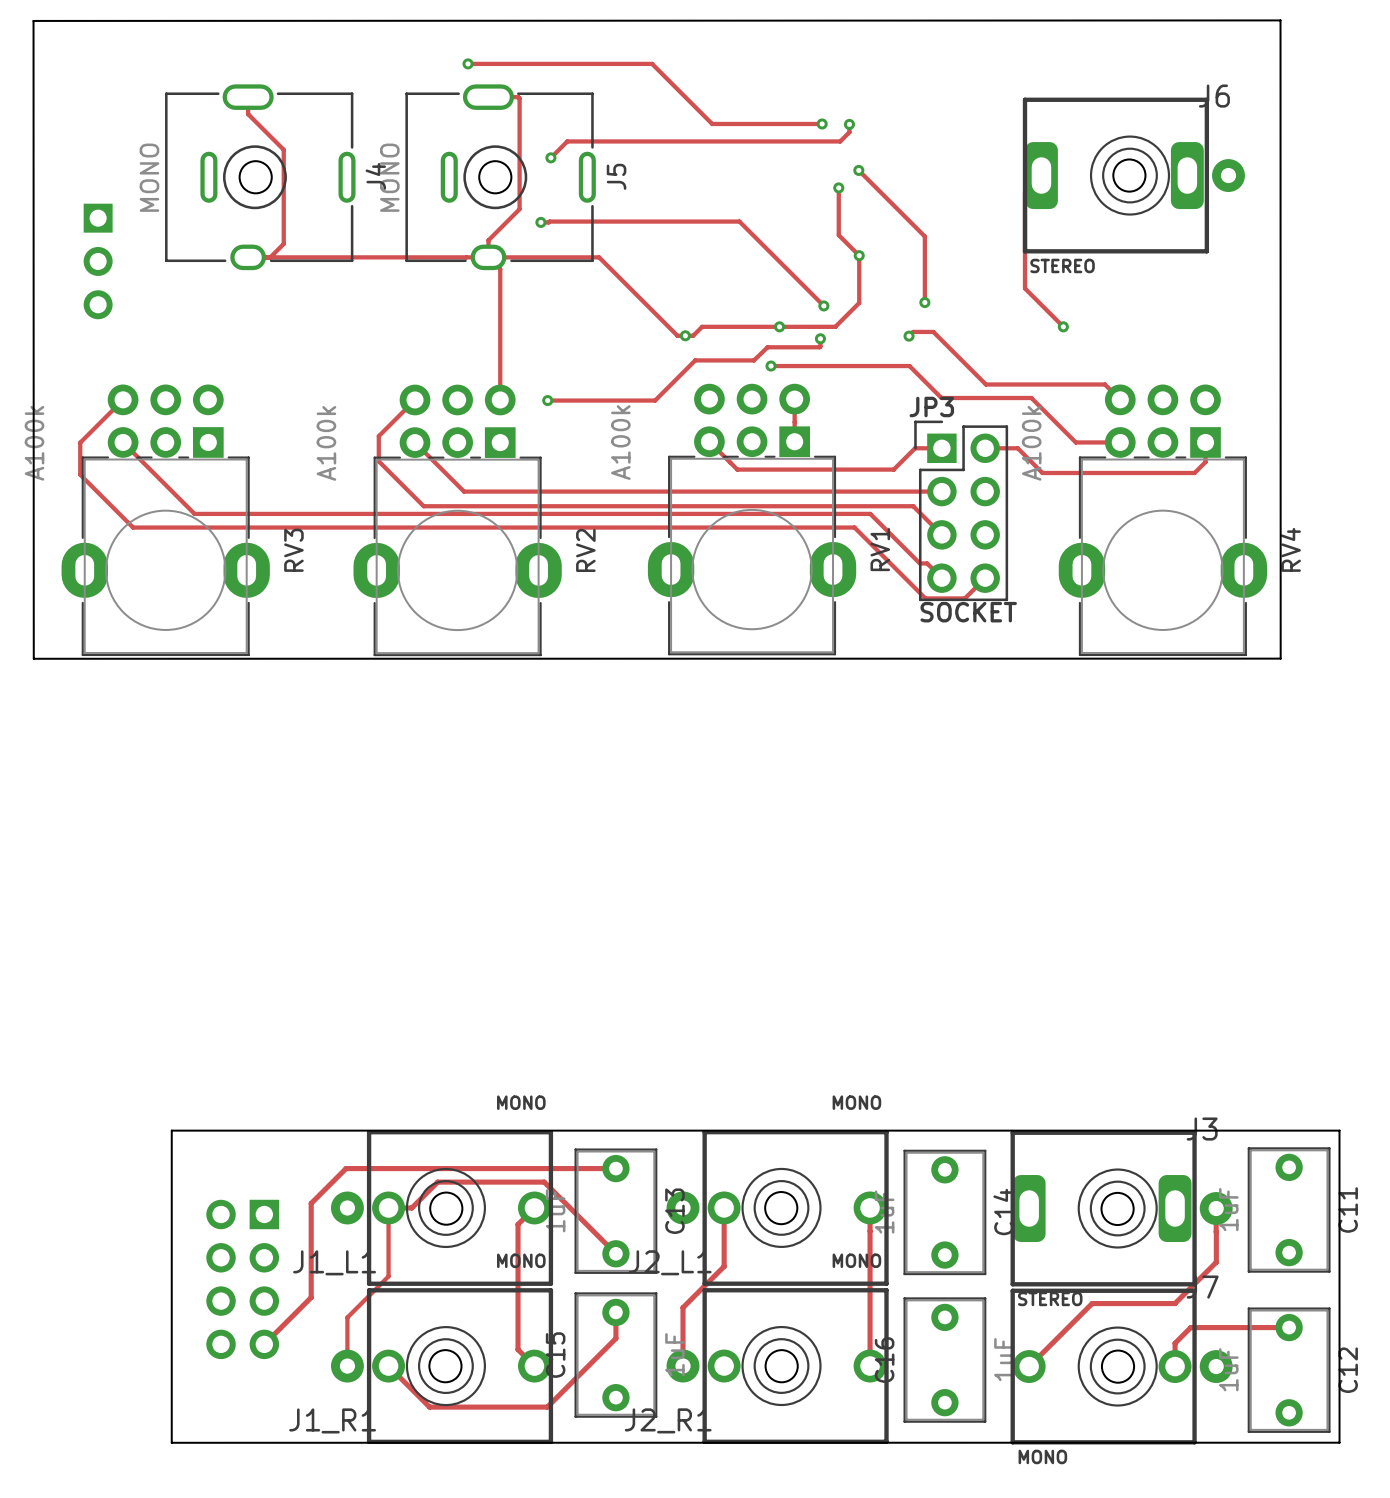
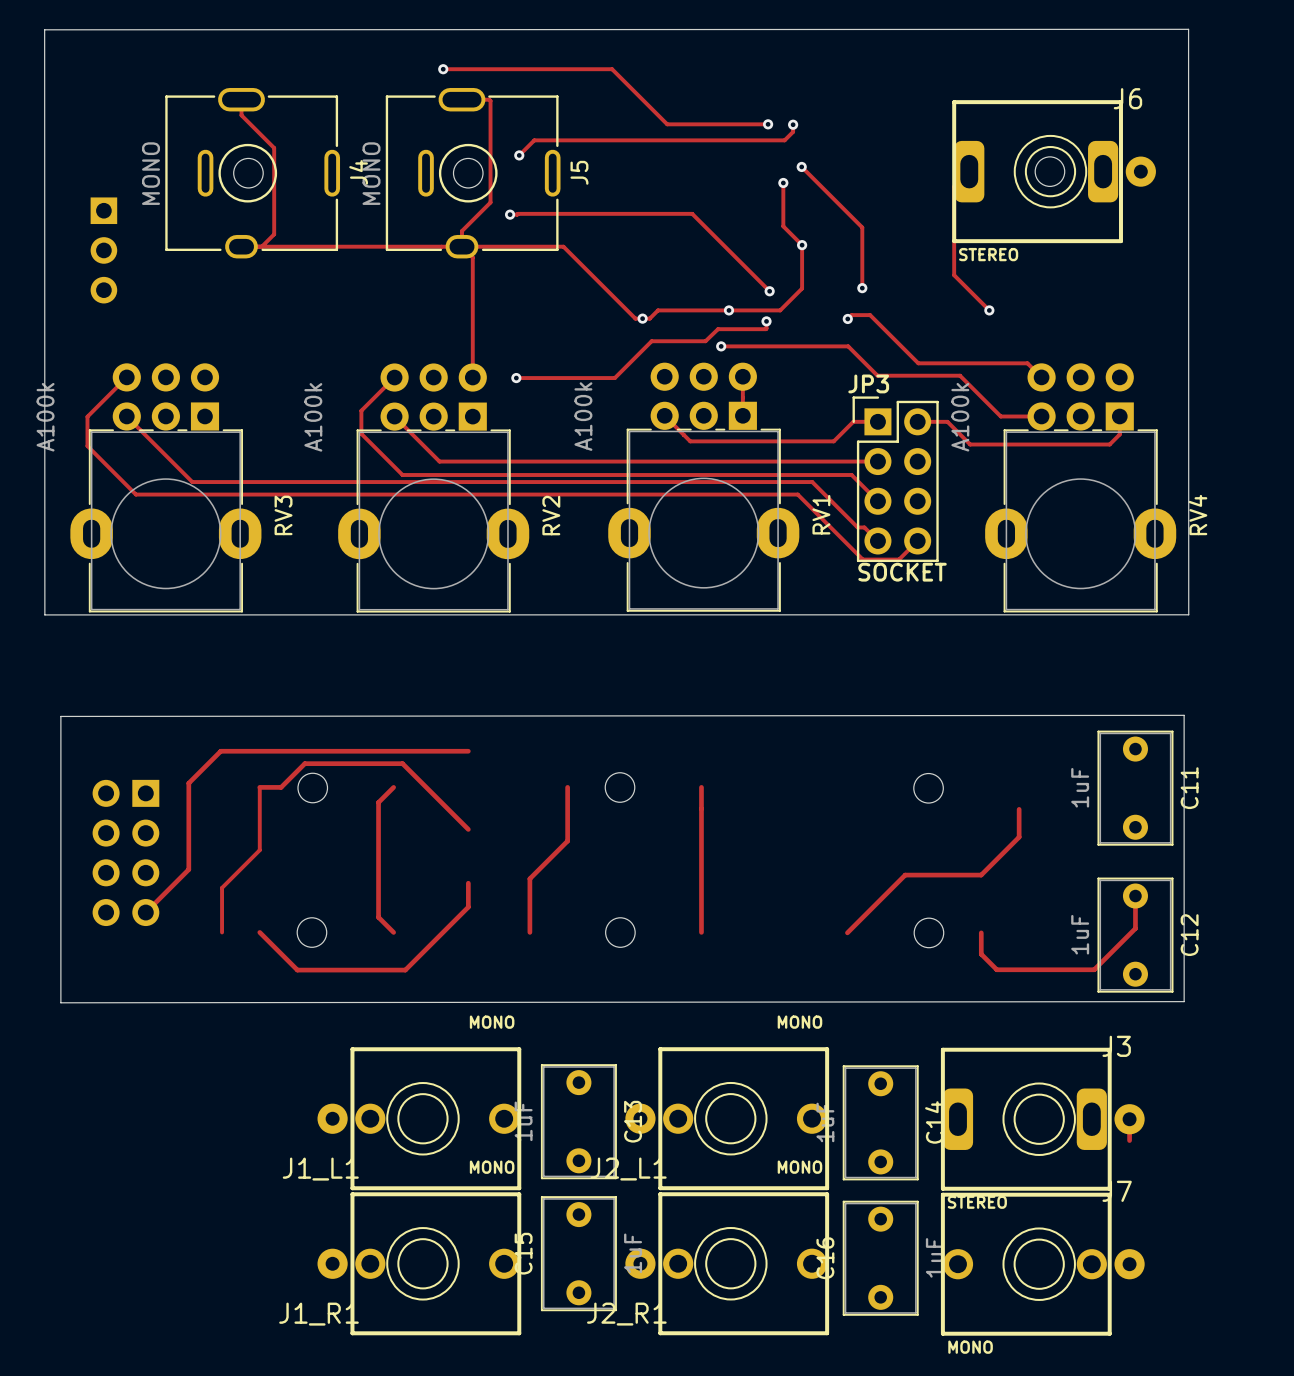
board edge: none -> (1184, 715) (60, 716) (60, 1002) (1184, 1001) (1184, 715)
round board edge: none -> [297, 772, 328, 804]
round board edge: none -> [604, 772, 636, 803]
round board edge: none -> [913, 773, 944, 804]
track: none -> (1135, 896) (1135, 928) (1094, 969) (996, 969) (981, 954) (981, 932)
round board edge: none -> [296, 917, 328, 948]
round board edge: none -> [605, 917, 636, 948]
round board edge: none -> [913, 917, 945, 949]
board edge: (171, 1130) (1339, 1130) (1339, 1442) (171, 1442) (171, 1130) -> none
track: (615, 1168) (346, 1168) (311, 1203) (311, 1297) (264, 1344) -> (468, 751) (220, 751) (188, 783) (188, 869) (145, 912)
round board edge: [764, 1191, 798, 1225] -> none
round board edge: [429, 1192, 463, 1226] -> none
round board edge: [1101, 1192, 1135, 1226] -> none
track: (534, 1207) (518, 1224) (518, 1349) (534, 1366) -> (393, 787) (378, 802) (378, 917) (393, 932)
track: (724, 1207) (724, 1266) (683, 1307) (683, 1366) -> (567, 787) (567, 841) (529, 878) (529, 932)
track: (870, 1207) (870, 1366) -> (701, 787) (701, 932)
C11 position: (1289, 1209) -> (1135, 788)
track: (1216, 1231) (1216, 1262) (1175, 1303) (1092, 1303) (1029, 1366) -> (1019, 809) (1019, 837) (981, 875) (905, 875) (847, 932)
track: (615, 1253) (544, 1182) (437, 1182) (411, 1207) (388, 1207) (388, 1276) (347, 1317) (347, 1366) -> (468, 829) (402, 763) (304, 763) (281, 787) (259, 787) (259, 850) (222, 887) (222, 932)
part position: (242, 1279) -> (125, 852)
track: (615, 1312) (615, 1338) (547, 1407) (429, 1407) (388, 1366) -> (468, 883) (468, 907) (405, 970) (297, 970) (259, 932)
track: (1289, 1327) (1190, 1327) (1175, 1343) (1175, 1366) -> none
round board edge: [428, 1349, 462, 1383] -> none
round board edge: [765, 1349, 799, 1383] -> none
round board edge: [1101, 1350, 1135, 1384] -> none
C12 position: (1289, 1370) -> (1135, 935)

